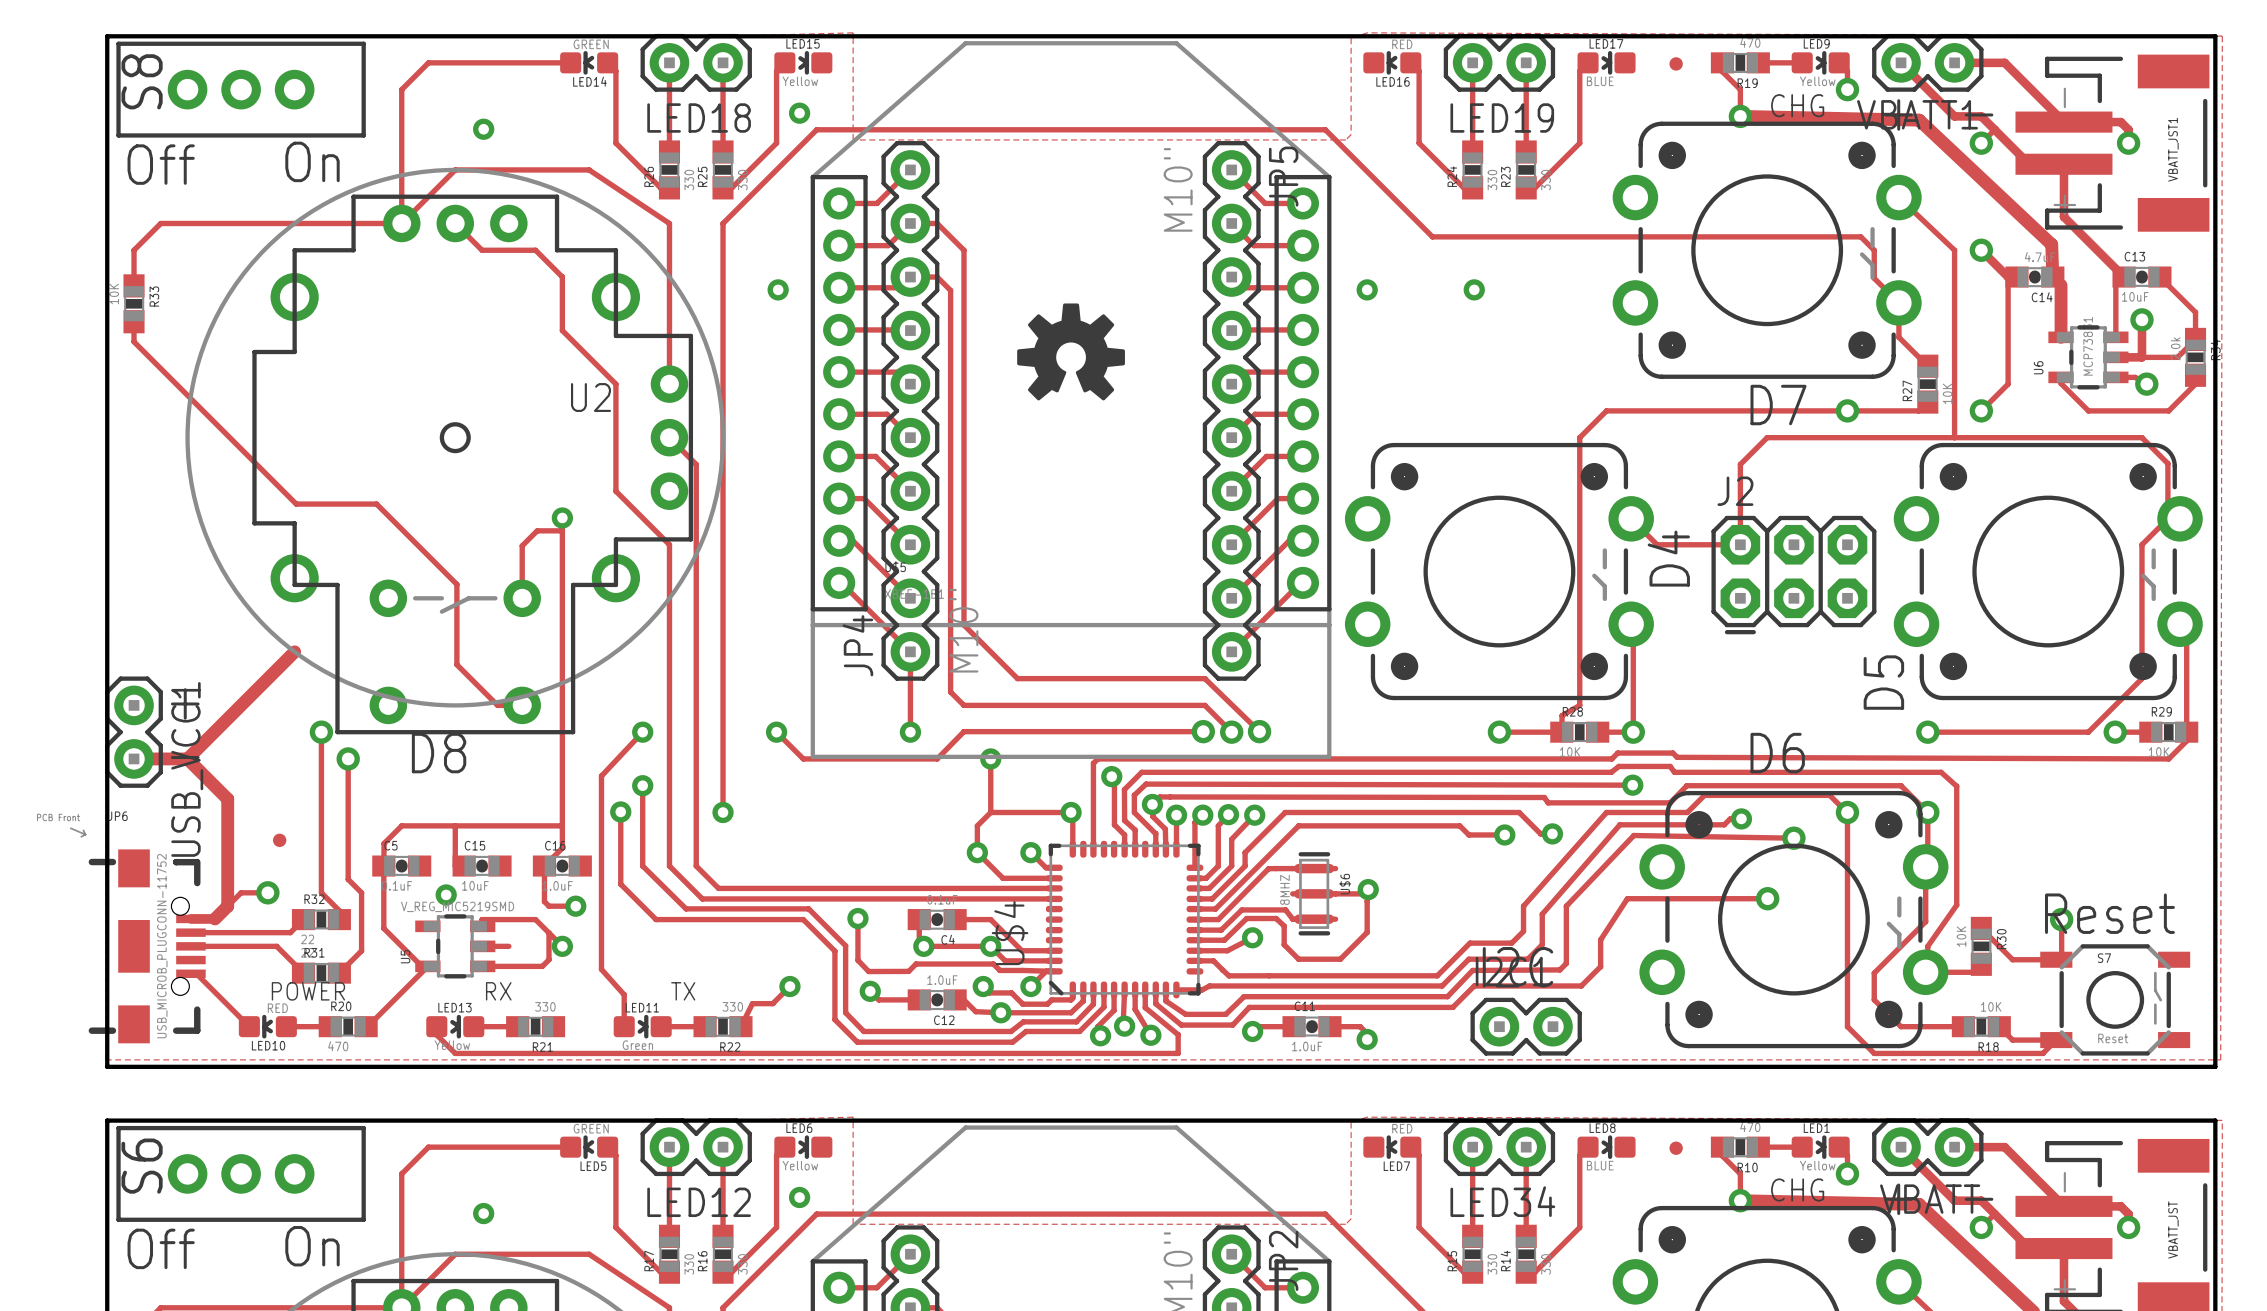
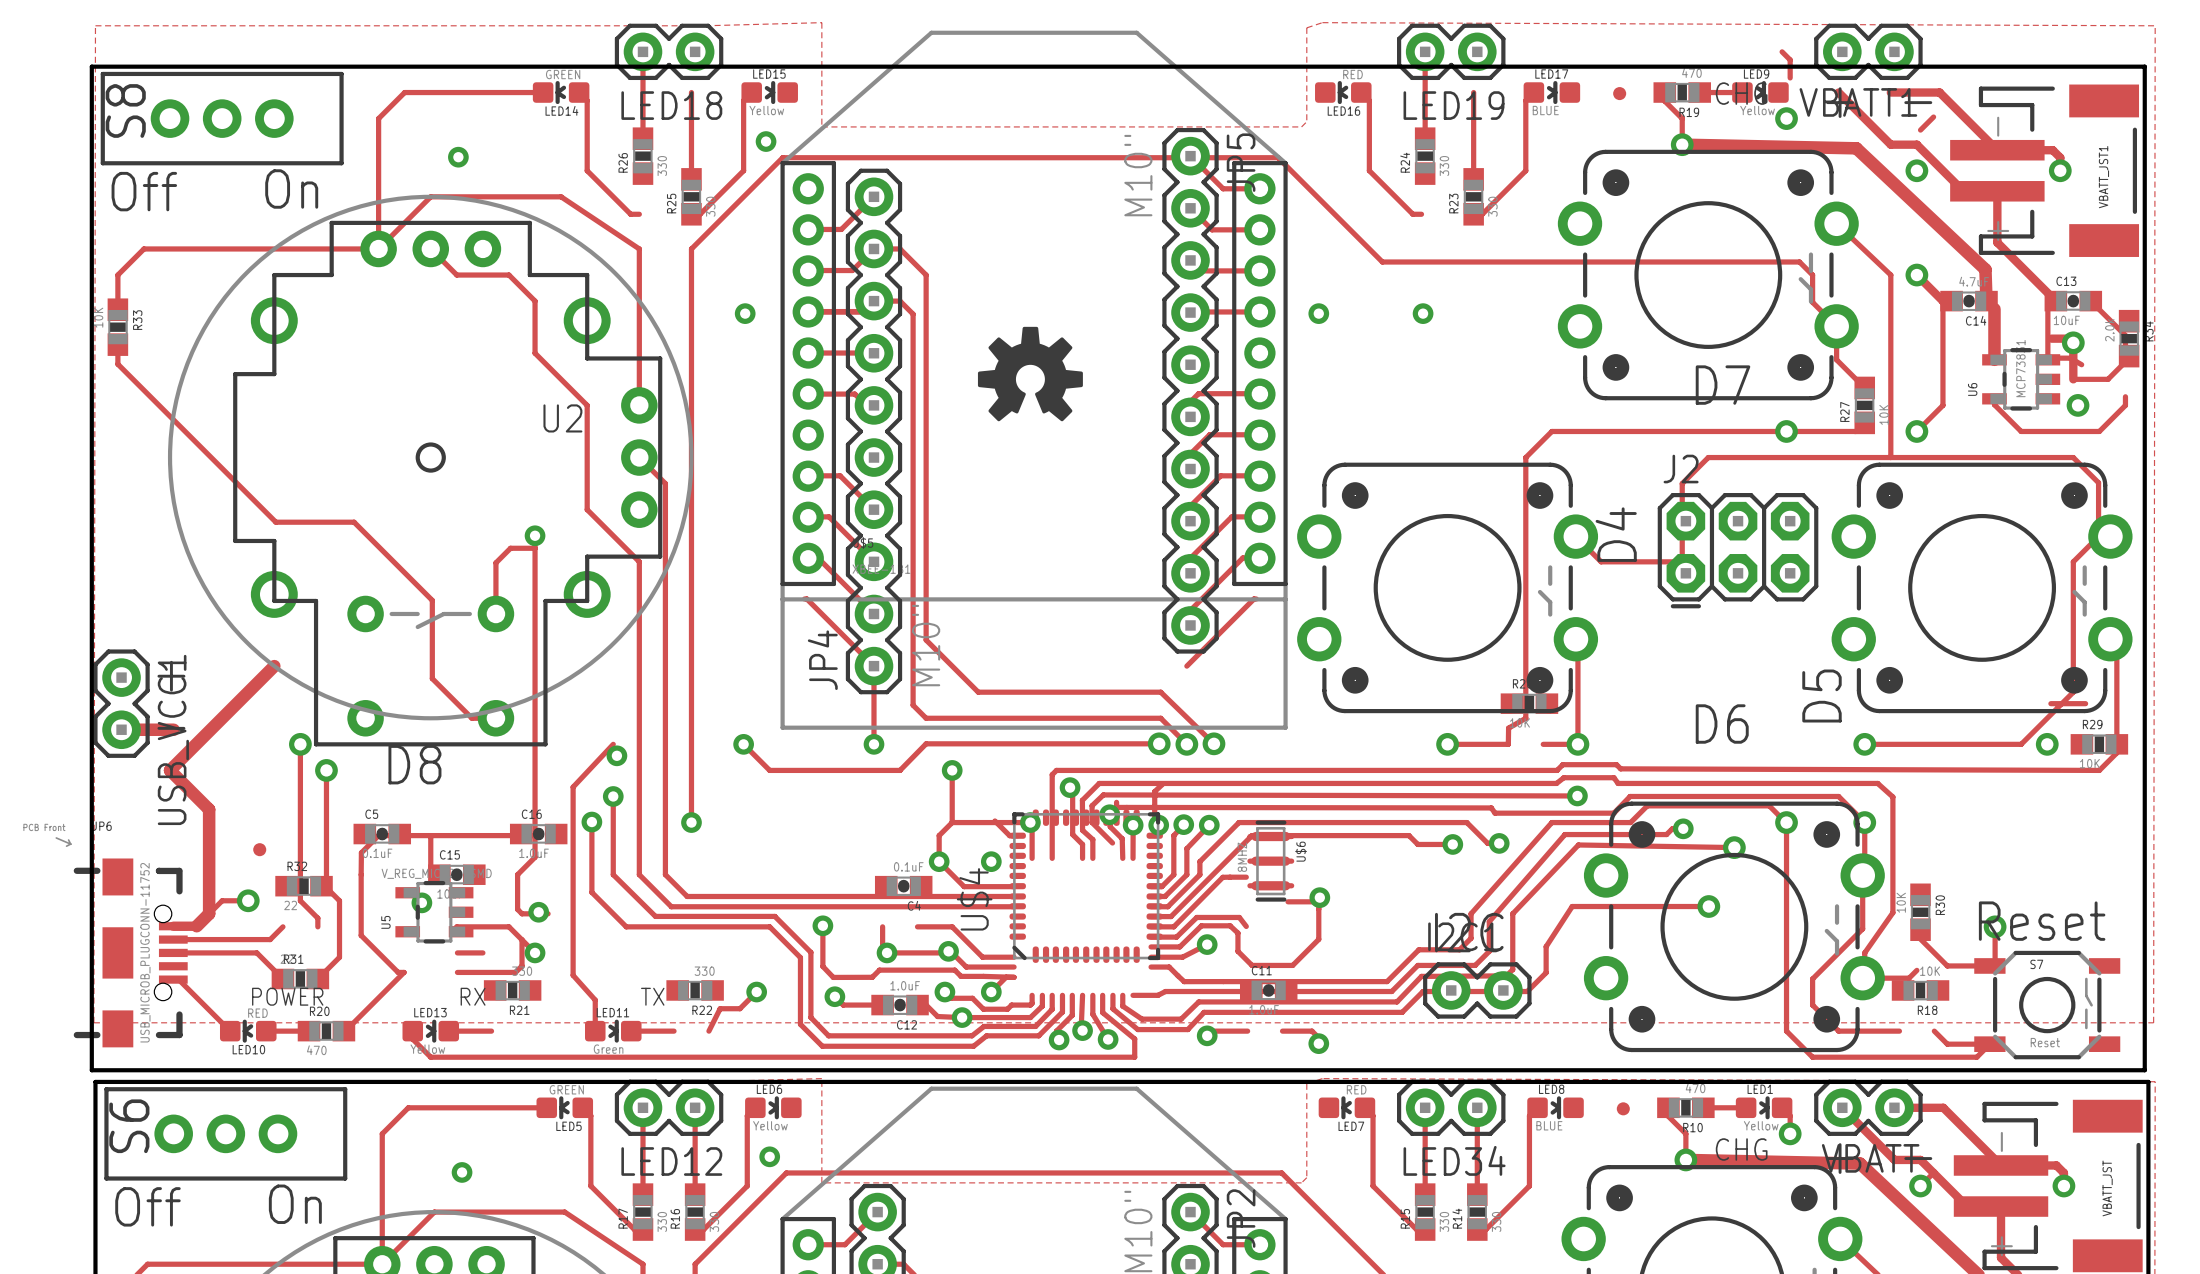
board edge: (107, 36) (2215, 36) (2215, 1066) (107, 1066) (107, 36) -> (91, 66) (2144, 66) (2144, 1070) (91, 1070) (91, 66)
track: (570, 62) (428, 62) (401, 89) (401, 223) -> (543, 92) (404, 92) (378, 118) (378, 248)
LED14 position: (589, 62) -> (561, 92)
track: (607, 62) (615, 71) (615, 143) (660, 187) (669, 187) -> (579, 92) (587, 100) (587, 170) (630, 214) (639, 214)
track: (723, 62) (723, 152) -> (691, 92) (691, 179)
track: (784, 62) (776, 71) (776, 143) (731, 187) (723, 187) -> (751, 92) (743, 100) (743, 170) (700, 214) (691, 214)
LED15 position: (803, 62) -> (769, 92)
LED16 position: (1392, 62) -> (1343, 92)
track: (1410, 62) (1419, 71) (1419, 143) (1463, 187) (1472, 187) -> (1361, 92) (1369, 100) (1369, 170) (1412, 214) (1421, 214)
track: (1526, 62) (1526, 152) -> (1473, 92) (1473, 179)
track: (1588, 62) (1579, 71) (1579, 143) (1535, 187) (1526, 187) -> (1533, 92) (1525, 100) (1525, 170) (1482, 214) (1473, 214)
LED17 position: (1606, 62) -> (1551, 92)
track: (1722, 62) (1722, 71) (1740, 89) (1740, 116) (1919, 120) (2051, 244) (2052, 277) (2061, 285) (2061, 337) -> (1664, 92) (1664, 101) (1682, 118) (1682, 144) (1856, 148) (1985, 269) (1986, 301) (1994, 309) (1994, 359)
R19 position: (1740, 62) -> (1682, 92)
track: (1758, 62) (1802, 62) -> (1699, 92) (1742, 92)
LED9 position: (1820, 62) -> (1760, 92)
track: (1901, 62) (1954, 116) (1981, 116) (2029, 164) (2063, 164) (2063, 216) (2124, 277) (2115, 285) (2115, 337) -> (1838, 92) (1890, 144) (1916, 144) (1963, 191) (1997, 191) (1997, 242) (2055, 301) (2047, 309) (2047, 359)
track: (1954, 62) (2004, 62) (2063, 122) (2120, 122) (2128, 129) (2128, 143) -> (1890, 92) (1939, 92) (1997, 150) (2052, 150) (2060, 157) (2060, 170)
part position: (1676, 63) -> (1619, 93)
S8 position: (241, 89) -> (222, 118)
via position: (1847, 89) -> (1786, 118)
via position: (799, 113) -> (766, 141)
via position: (1740, 116) -> (1682, 144)
via position: (483, 129) -> (458, 157)
via: (1981, 143) -> none
VBATT_JST1 position: (2112, 143) -> (2044, 170)
via position: (2128, 143) -> (2060, 170)
text position: On (312, 161) -> On (291, 189)
text position: Off (161, 164) -> Off (144, 191)
R25 position: (723, 169) -> (691, 196)
track: (910, 169) (876, 203) (839, 203) -> (873, 196) (841, 229) (804, 229)
R23 position: (1526, 169) -> (1473, 196)
via: none -> (1916, 170)
track: (1898, 197) (1954, 250) (1954, 437) -> (1836, 223) (1890, 275) (1890, 457)
track: (401, 223) (160, 223) (134, 250) (134, 285) -> (378, 248) (143, 248) (117, 275) (117, 309)
track: (401, 223) (455, 169) (589, 169) (669, 223) (669, 384) -> (378, 248) (430, 196) (561, 196) (639, 248) (639, 405)
track: (455, 223) (482, 250) (535, 250) (562, 277) (562, 330) (615, 384) (615, 491) (669, 544) (669, 866) (702, 898) (1054, 898) -> (430, 248) (456, 275) (508, 275) (535, 301) (535, 353) (587, 405) (587, 509) (639, 561) (639, 874) (671, 906) (1014, 906)
track: (839, 245) (888, 245) (910, 223) (937, 223) (963, 250) (963, 625) (1017, 678) (1204, 678) (1259, 731) -> (804, 270) (852, 270) (873, 248) (900, 248) (926, 275) (926, 640) (978, 692) (1160, 692) (1213, 743)
part position: (1767, 250) -> (1708, 275)
track: (1981, 250) (2008, 277) -> (1916, 275) (1942, 301)
via: (1981, 250) -> none
track: (2008, 277) (2008, 384) (1981, 410) -> (1942, 301) (1942, 405) (1916, 431)
C14 position: (2034, 277) -> (1969, 301)
C13 position: (2141, 277) -> (2073, 301)
track: (2159, 277) (2195, 312) (2195, 339) (2177, 357) (2141, 357) (2141, 319) -> (2090, 301) (2125, 335) (2125, 361) (2108, 379) (2073, 379) (2073, 342)
track: (839, 287) (899, 287) (910, 277) (937, 277) (950, 290) (950, 692) (963, 705) (1204, 705) (1231, 732) -> (804, 311) (863, 311) (873, 301) (900, 301) (913, 314) (913, 705) (926, 718) (1160, 718) (1186, 744)
via position: (778, 289) -> (745, 313)
via position: (1367, 289) -> (1318, 313)
via position: (1474, 289) -> (1423, 313)
via: none -> (1916, 275)
R33 position: (134, 303) -> (117, 327)
via: (2141, 319) -> none
track: (134, 321) (134, 341) (296, 504) (376, 504) (456, 584) (456, 664) (497, 705) (522, 705) -> (117, 344) (117, 364) (275, 522) (354, 522) (432, 600) (432, 678) (471, 718) (495, 718)
drawing position: (1071, 351) -> (1030, 374)
U6 position: (2088, 357) -> (2021, 379)
via: none -> (2073, 342)
track: (1927, 366) (1898, 337) (1898, 302) (1874, 278) (1874, 250) (1860, 236) (1432, 236) (1325, 129) (816, 129) (723, 223) (723, 812) -> (1864, 387) (1836, 359) (1836, 326) (1812, 302) (1812, 275) (1799, 262) (1382, 262) (1278, 157) (782, 157) (691, 248) (691, 822)
track: (1302, 372) (1243, 372) (1231, 384) -> (1256, 393) (1198, 393) (1186, 405)
track: (2195, 375) (2195, 384) (2168, 410) (2088, 410) (2061, 383) (2061, 377) -> (2125, 396) (2125, 405) (2099, 431) (2021, 431) (1994, 404) (1994, 398)
R27 position: (1927, 384) -> (1864, 405)
via: (2146, 384) -> none
track: (1927, 402) (1918, 410) (1606, 410) (1579, 437) (1579, 705) (1562, 715) (1561, 732) (1499, 732) -> (1864, 422) (1855, 431) (1551, 431) (1525, 457) (1525, 718) (1508, 728) (1508, 744) (1447, 744)
JP4 position: (910, 410) -> (873, 431)
via position: (1847, 410) -> (1786, 431)
via position: (1981, 410) -> (1916, 431)
track: (1302, 414) (1255, 414) (1231, 437) -> (1256, 434) (1209, 434) (1186, 457)
via: none -> (2078, 405)
track: (669, 437) (696, 464) (696, 866) (718, 888) (1054, 888) -> (639, 457) (665, 483) (665, 874) (687, 896) (1014, 896)
U2 position: (455, 451) -> (430, 470)
track: (839, 456) (875, 456) (910, 491) -> (804, 475) (840, 475) (873, 509)
track: (1302, 456) (1266, 456) (1231, 491) -> (1256, 475) (1220, 475) (1186, 509)
track: (839, 498) (864, 498) (910, 544) -> (804, 516) (829, 516) (873, 561)
track: (1302, 498) (1277, 498) (1231, 544) -> (1256, 516) (1231, 516) (1186, 561)
track: (562, 517) (562, 848) (544, 866) (544, 901) (548, 906) (575, 906) -> (535, 535) (535, 857) (517, 874) (517, 909) (522, 913) (548, 913)
via position: (562, 517) -> (535, 535)
track: (1631, 518) (1657, 544) (1740, 544) (1740, 464) (1767, 437) (2141, 437) (2167, 463) (2167, 518) -> (1575, 536) (1601, 561) (1682, 561) (1682, 483) (1708, 457) (2073, 457) (2098, 482) (2098, 536)
track: (2167, 518) (2141, 544) (2141, 678) (2088, 732) (1927, 732) -> (2098, 536) (2073, 561) (2073, 692) (2021, 744) (1864, 744)
track: (562, 530) (537, 530) (522, 545) (522, 598) -> (535, 548) (510, 548) (495, 562) (495, 613)
track: (839, 540) (852, 540) (910, 598) -> (804, 557) (817, 557) (873, 613)
track: (1302, 540) (1289, 540) (1231, 598) -> (1256, 557) (1242, 557) (1186, 613)
part position: (1499, 571) -> (1447, 587)
part position: (2048, 571) -> (1982, 587)
track: (839, 582) (841, 582) (910, 651) (910, 732) -> (804, 598) (806, 598) (873, 666) (873, 744)
track: (1302, 582) (1300, 582) (1231, 651) -> (1256, 598) (1253, 598) (1186, 666)
track: (1631, 624) (1633, 626) (1633, 732) (1597, 732) -> (1575, 639) (1577, 641) (1577, 744) (1543, 744)
track: (2180, 624) (2186, 630) (2186, 741) (2168, 758) (1677, 757) (1672, 753) (1617, 753) (1611, 758) (1097, 758) (1093, 763) (1093, 849) -> (2110, 639) (2116, 645) (2116, 752) (2099, 770) (1620, 768) (1616, 764) (1562, 764) (1557, 770) (1056, 770) (1052, 774) (1052, 858)
track: (294, 651) (187, 758) (227, 799) (227, 906) -> (274, 666) (170, 770) (209, 809) (209, 913)
text position: D5 (1883, 682) -> D5 (1821, 696)
track: (1203, 731) (963, 731) (937, 758) (803, 758) (776, 732) -> (1159, 743) (926, 743) (900, 770) (769, 770) (743, 744)
via: (1203, 731) -> none
via: (1259, 731) -> none
track: (321, 732) (321, 892) (339, 910) (339, 919) -> (300, 744) (300, 900) (317, 918) (317, 926)
via: (321, 732) -> none
track: (642, 732) (601, 776) (601, 969) (624, 994) (624, 1026) -> (613, 744) (573, 787) (573, 975) (595, 1000) (595, 1031)
via: (642, 732) -> none
via: (776, 732) -> none
via position: (910, 732) -> (873, 744)
via: (1231, 732) -> none
via position: (1499, 732) -> (1447, 744)
via position: (1633, 732) -> (1577, 744)
via: (1927, 732) -> none
via position: (2115, 732) -> (2047, 744)
R29 position: (2168, 732) -> (2099, 744)
text position: D8 (439, 753) -> D8 (414, 764)
track: (348, 758) (348, 879) (361, 892) (361, 950) (339, 973) -> (326, 770) (326, 887) (339, 900) (339, 957) (317, 978)
via: (348, 758) -> none
track: (990, 758) (990, 812) -> (952, 770) (952, 822)
via: (990, 758) -> none
via: none -> (300, 744)
via: none -> (743, 744)
via: none -> (1159, 743)
via: none -> (1186, 744)
via: none -> (1213, 743)
via: none -> (1864, 744)
track: (1111, 776) (1114, 781) (1114, 824) (1124, 834) (1124, 849) -> (1070, 787) (1073, 792) (1072, 834) (1082, 844) (1082, 858)
via: (1111, 776) -> none
track: (642, 785) (642, 866) (686, 908) (808, 908) (845, 945) (845, 1012) (863, 1031) (1011, 1031) (1023, 1021) (1076, 1021) (1093, 1004) (1093, 989) -> (613, 796) (613, 874) (655, 916) (774, 916) (810, 952) (810, 1017) (828, 1035) (972, 1035) (984, 1026) (1035, 1026) (1052, 1009) (1052, 995)
track: (1632, 785) (1146, 784) (1134, 795) (1134, 812) (1155, 833) -> (1577, 795) (1103, 794) (1092, 805) (1092, 822) (1112, 843)
via: (1632, 785) -> none
via: none -> (326, 770)
via: none -> (952, 770)
via: (1152, 804) -> none
track: (620, 811) (620, 884) (656, 919) (803, 919) (834, 951) (834, 1019) (857, 1042) (1012, 1042) (1026, 1031) (1079, 1031) (1103, 1007) (1103, 989) -> (591, 822) (591, 892) (626, 926) (769, 926) (800, 957) (800, 1024) (822, 1046) (973, 1046) (986, 1035) (1038, 1035) (1062, 1012) (1062, 995)
via: (620, 811) -> none
via: (723, 812) -> none
track: (990, 812) (1071, 812) (1072, 814) (1072, 849) -> (952, 822) (1030, 822) (1032, 824) (1032, 858)
track: (990, 812) (977, 825) (977, 852) (1003, 878) (1054, 878) -> (952, 822) (939, 835) (939, 861) (964, 886) (1014, 886)
via: (1071, 812) -> none
via: (1847, 812) -> none
via: (1927, 812) -> none
track: (1228, 814) (1218, 825) (1218, 866) (1206, 878) (1194, 878) -> (1183, 824) (1173, 835) (1173, 874) (1161, 886) (1151, 886)
via: (1228, 814) -> none
track: (1176, 815) (1176, 849) -> (1133, 825) (1133, 858)
via: (1176, 815) -> none
via: (1202, 815) -> none
track: (1254, 815) (1231, 839) (1231, 866) (1209, 888) (1194, 888) -> none
via: (1254, 815) -> none
via: none -> (1070, 787)
track: (1741, 818) (1730, 818) (1724, 824) (1619, 824) (1542, 914) (1542, 944) (1527, 959) (1468, 959) (1442, 985) (1209, 985) (1202, 989) (1176, 989) -> (1683, 828) (1672, 828) (1666, 834) (1564, 834) (1489, 921) (1489, 951) (1475, 965) (1417, 965) (1391, 991) (1165, 991) (1157, 995) (1133, 995)
via position: (1741, 818) -> (1683, 828)
track: (455, 825) (455, 866) (464, 866) -> (430, 835) (430, 874) (439, 874)
track: (562, 825) (401, 825) (384, 843) (383, 928) (421, 966) (427, 966) (366, 1026) -> (535, 835) (378, 835) (361, 852) (361, 935) (398, 972) (404, 972) (343, 1031)
via: none -> (1577, 795)
via: none -> (613, 796)
track: (1552, 833) (1540, 833) (1519, 812) (1285, 812) (1245, 852) (1245, 866) (1212, 898) (1194, 898) -> (1499, 843) (1487, 843) (1466, 822) (1239, 822) (1199, 861) (1199, 874) (1167, 906) (1151, 906)
via: (1552, 833) -> none
track: (1504, 834) (1468, 834) (1459, 825) (1298, 825) (1215, 909) (1194, 909) -> (1452, 844) (1417, 844) (1409, 835) (1252, 835) (1171, 916) (1151, 916)
via: (1504, 834) -> none
track: (1793, 838) (1633, 835) (1566, 906) (1566, 963) (1559, 969) (1472, 970) (1447, 996) (1244, 996) (1225, 1014) (1185, 1014) (1165, 1001) (1165, 989) -> (1734, 847) (1578, 844) (1512, 913) (1512, 969) (1506, 975) (1421, 976) (1397, 1001) (1198, 1001) (1181, 1019) (1142, 1019) (1122, 1006) (1122, 995)
via: (1793, 838) -> none
part position: (279, 840) -> (259, 849)
via: none -> (1109, 814)
track: (1135, 849) (1135, 829) (1124, 820) (1124, 789) (1141, 772) (1611, 772) (1618, 766) (1670, 766) (1674, 772) (1941, 772) (1956, 786) (1956, 905) (1927, 946) (1927, 970) (1925, 972) (1973, 972) (1981, 964) -> (1092, 858) (1092, 839) (1082, 830) (1082, 800) (1099, 783) (1556, 783) (1563, 777) (1613, 777) (1618, 783) (1877, 783) (1892, 797) (1892, 912) (1864, 952) (1864, 976) (1862, 978) (1909, 978) (1916, 970)
track: (1165, 849) (1165, 829) (1152, 816) (1152, 804) (1159, 796) (1544, 797) (1548, 802) (1670, 802) (1686, 785) (1901, 785) (1927, 812) (1925, 921) (1874, 973) (1874, 999) (1901, 1026) (1963, 1026) -> (1122, 858) (1122, 838) (1110, 826) (1109, 814) (1116, 807) (1491, 807) (1495, 813) (1613, 813) (1630, 796) (1838, 796) (1864, 822) (1862, 928) (1812, 978) (1812, 1005) (1838, 1031) (1899, 1031)
via: (977, 852) -> none
via: (1030, 852) -> none
via: none -> (591, 822)
via: none -> (691, 822)
via: none -> (1030, 822)
via: none -> (1786, 822)
via: none -> (1864, 822)
via: none -> (1133, 825)
via: none -> (1158, 825)
via: none -> (1183, 824)
via: none -> (1209, 825)
C15 position: (482, 866) -> (456, 874)
track: (1292, 868) (1268, 868) (1218, 919) (1194, 919) -> (1246, 877) (1222, 877) (1173, 926) (1151, 926)
via: none -> (1499, 843)
via: none -> (1452, 844)
via: none -> (1734, 847)
via position: (1368, 889) -> (1319, 897)
track: (267, 892) (241, 892) (227, 906) -> (248, 900) (222, 900) (209, 913)
via position: (267, 892) -> (248, 900)
track: (1335, 893) (1363, 893) (1368, 889) (1367, 932) (1340, 959) (1298, 959) (1284, 944) (1284, 926) (1276, 918) (1246, 918) (1224, 940) (1194, 940) -> (1288, 901) (1315, 901) (1319, 897) (1318, 939) (1292, 965) (1252, 965) (1237, 951) (1237, 933) (1230, 925) (1201, 925) (1179, 946) (1151, 946)
via position: (446, 894) -> (421, 902)
via: none -> (939, 861)
via: none -> (991, 861)
track: (1767, 898) (1627, 898) (1600, 939) (1600, 966) (1581, 985) (1474, 985) (1452, 1007) (1249, 1007) (1232, 1025) (1181, 1025) (1155, 1003) (1155, 989) -> (1708, 906) (1572, 906) (1546, 946) (1546, 972) (1527, 991) (1423, 991) (1402, 1012) (1204, 1012) (1187, 1029) (1137, 1029) (1112, 1008) (1112, 995)
via: (1767, 898) -> none
track: (227, 906) (214, 918) (190, 918) -> (209, 913) (196, 926) (173, 926)
via: (575, 906) -> none
text position: Reset (2109, 913) -> Reset (2042, 921)
track: (857, 918) (857, 960) (868, 971) (908, 971) (916, 964) (993, 964) (999, 970) (1054, 971) (1046, 971) (1030, 986) -> (822, 925) (822, 966) (833, 977) (872, 977) (879, 970) (954, 970) (961, 976) (1014, 977) (1006, 977) (991, 992)
via: (857, 918) -> none
track: (303, 919) (290, 932) (190, 932) -> (282, 926) (270, 939) (173, 939)
track: (919, 919) (919, 941) (923, 946) (990, 946) (1005, 960) (1054, 960) -> (882, 926) (882, 948) (887, 952) (952, 952) (966, 967) (1014, 967)
track: (955, 919) (990, 919) (1021, 950) (1054, 950) -> (917, 926) (952, 926) (982, 957) (1014, 957)
track: (1292, 919) (1285, 909) (1241, 909) (1221, 930) (1205, 930) -> (1209, 825) (1186, 848) (1186, 874) (1165, 896)
part position: (1793, 919) -> (1734, 926)
track: (2061, 919) (2061, 954) (2056, 959) (2012, 959) (1981, 928) -> (1995, 926) (1995, 960) (1989, 965) (1947, 965) (1916, 935)
via position: (2061, 919) -> (1995, 926)
track: (482, 926) (482, 919) (535, 919) (562, 946) -> (457, 933) (456, 926) (508, 926) (535, 952)
track: (548, 932) (548, 959) (542, 966) (482, 966) -> (522, 939) (522, 965) (515, 972) (457, 972)
JP6 position: (137, 935) -> (121, 942)
track: (1252, 937) (1227, 950) (1194, 950) -> (1207, 944) (1182, 957) (1151, 957)
via: (1252, 937) -> none
via: none -> (1708, 906)
track: (190, 946) (276, 946) (303, 973) -> (173, 952) (256, 952) (282, 978)
track: (482, 946) (508, 946) -> (457, 952) (482, 952)
via: (923, 946) -> none
via: (990, 946) -> none
via: none -> (822, 925)
track: (1194, 960) (1213, 960) (1228, 975) (1437, 975) (1469, 943) (1511, 943) (1523, 931) (1523, 906) (1606, 812) (1687, 812) (1704, 795) (1829, 795) (1847, 812) (1847, 1026) (1874, 1053) (2042, 1053) (2056, 1040) (2012, 1040) (1999, 1026) -> (1151, 967) (1169, 967) (1184, 981) (1387, 981) (1418, 949) (1459, 949) (1471, 938) (1471, 913) (1551, 822) (1630, 822) (1647, 805) (1769, 805) (1786, 822) (1786, 1031) (1812, 1057) (1976, 1057) (1989, 1044) (1947, 1044) (1934, 1031)
track: none -> (1246, 926) (1239, 917) (1196, 917) (1176, 937) (1151, 937)
track: (190, 973) (196, 973) (249, 1026) -> (173, 979) (178, 979) (230, 1031)
R31 position: (321, 973) -> (300, 978)
via: none -> (1207, 944)
track: (789, 986) (772, 1003) (752, 1003) (740, 1026) -> (756, 992) (739, 1008) (720, 1008) (708, 1031)
via: (789, 986) -> none
track: (983, 986) (989, 992) (1011, 992) (1022, 1004) (1047, 1004) (1051, 999) (1071, 999) (1072, 989) -> (944, 992) (950, 998) (972, 998) (983, 1009) (1007, 1009) (1011, 1005) (1030, 1005) (1032, 995)
via: (1030, 986) -> none
via: none -> (535, 952)
via: none -> (887, 952)
track: (1083, 989) (1083, 1001) (1071, 1012) (975, 1011) (963, 999) (955, 999) -> (1042, 995) (1042, 1006) (1030, 1017) (937, 1016) (926, 1005) (917, 1005)
track: (1114, 989) (1114, 1010) (1097, 1026) (1097, 1034) (1100, 1035) -> (1072, 995) (1072, 1015) (1056, 1031) (1056, 1038) (1059, 1040)
track: (1124, 989) (1123, 1028) (1124, 1026) -> (1082, 995) (1081, 1033) (1082, 1030)
track: (1135, 989) (1135, 1009) (1150, 1035) -> (1092, 995) (1092, 1014) (1108, 1039)
track: (1145, 989) (1145, 1007) (1178, 1034) (1178, 1053) (455, 1053) (436, 1034) (436, 1026) -> (1102, 995) (1102, 1012) (1134, 1038) (1134, 1057) (430, 1057) (412, 1039) (412, 1031)
text position: POWER (308, 991) -> POWER (287, 996)
text position: RX (498, 991) -> RX (473, 996)
text position: TX (683, 991) -> TX (652, 996)
track: (870, 991) (878, 999) (919, 999) -> (834, 996) (843, 1005) (882, 1005)
via: (870, 991) -> none
C12 position: (937, 999) -> (900, 1005)
S7 position: (2115, 999) -> (2047, 1005)
via: (1000, 1012) -> none
LED10 position: (267, 1026) -> (248, 1031)
track: (286, 1026) (330, 1026) -> (266, 1031) (309, 1031)
R20 position: (348, 1026) -> (326, 1031)
LED13 position: (455, 1026) -> (430, 1031)
track: (473, 1026) (517, 1026) -> (448, 1031) (491, 1031)
LED11 position: (642, 1026) -> (613, 1031)
track: (661, 1026) (705, 1026) -> (631, 1031) (674, 1031)
via: (1124, 1026) -> none
track: (1294, 1026) (1258, 1026) (1252, 1031) -> (1247, 1031) (1212, 1031) (1207, 1035)
track: (1329, 1026) (1360, 1026) (1367, 1033) (1367, 1039) -> (1282, 1031) (1312, 1031) (1318, 1037) (1318, 1043)
via: none -> (756, 992)
via: none -> (944, 992)
via: none -> (991, 992)
via: (1252, 1031) -> none
via: none -> (834, 996)
via: (1100, 1035) -> none
via: (1150, 1035) -> none
via position: (1367, 1039) -> (1318, 1043)
via: none -> (962, 1017)
via: none -> (1082, 1030)
via: none -> (1207, 1035)
via: none -> (1059, 1040)
via: none -> (1108, 1039)

